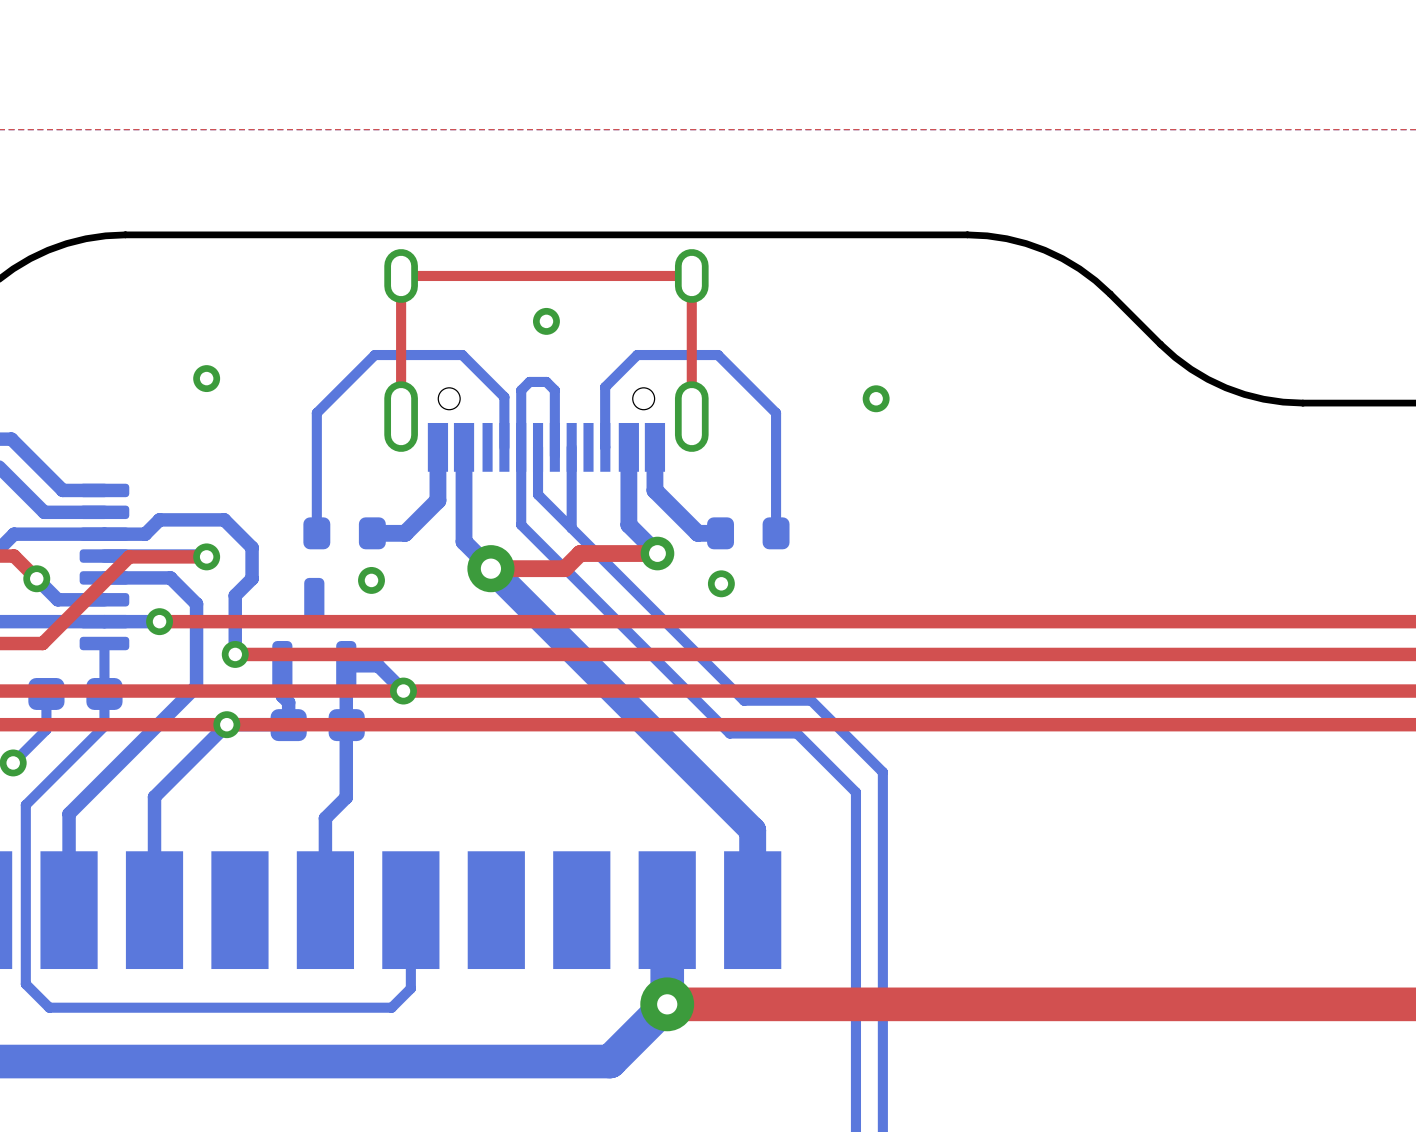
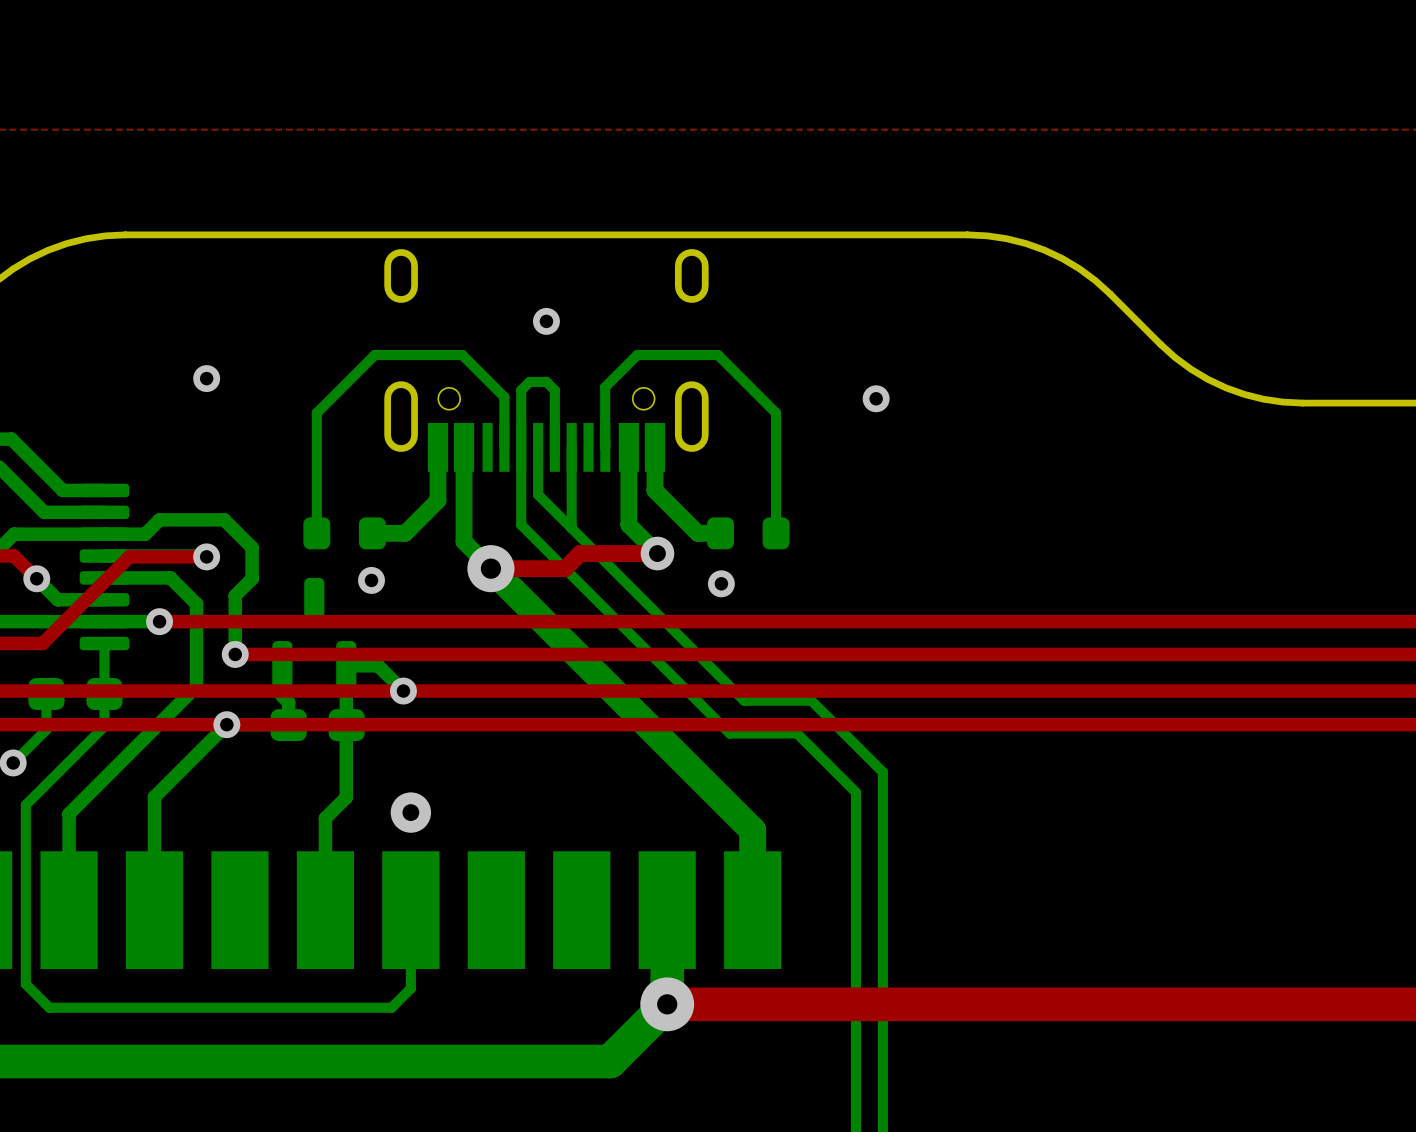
top track: (401, 416) (401, 275) (691, 275) (691, 416) -> none
via: none -> (410, 812)

